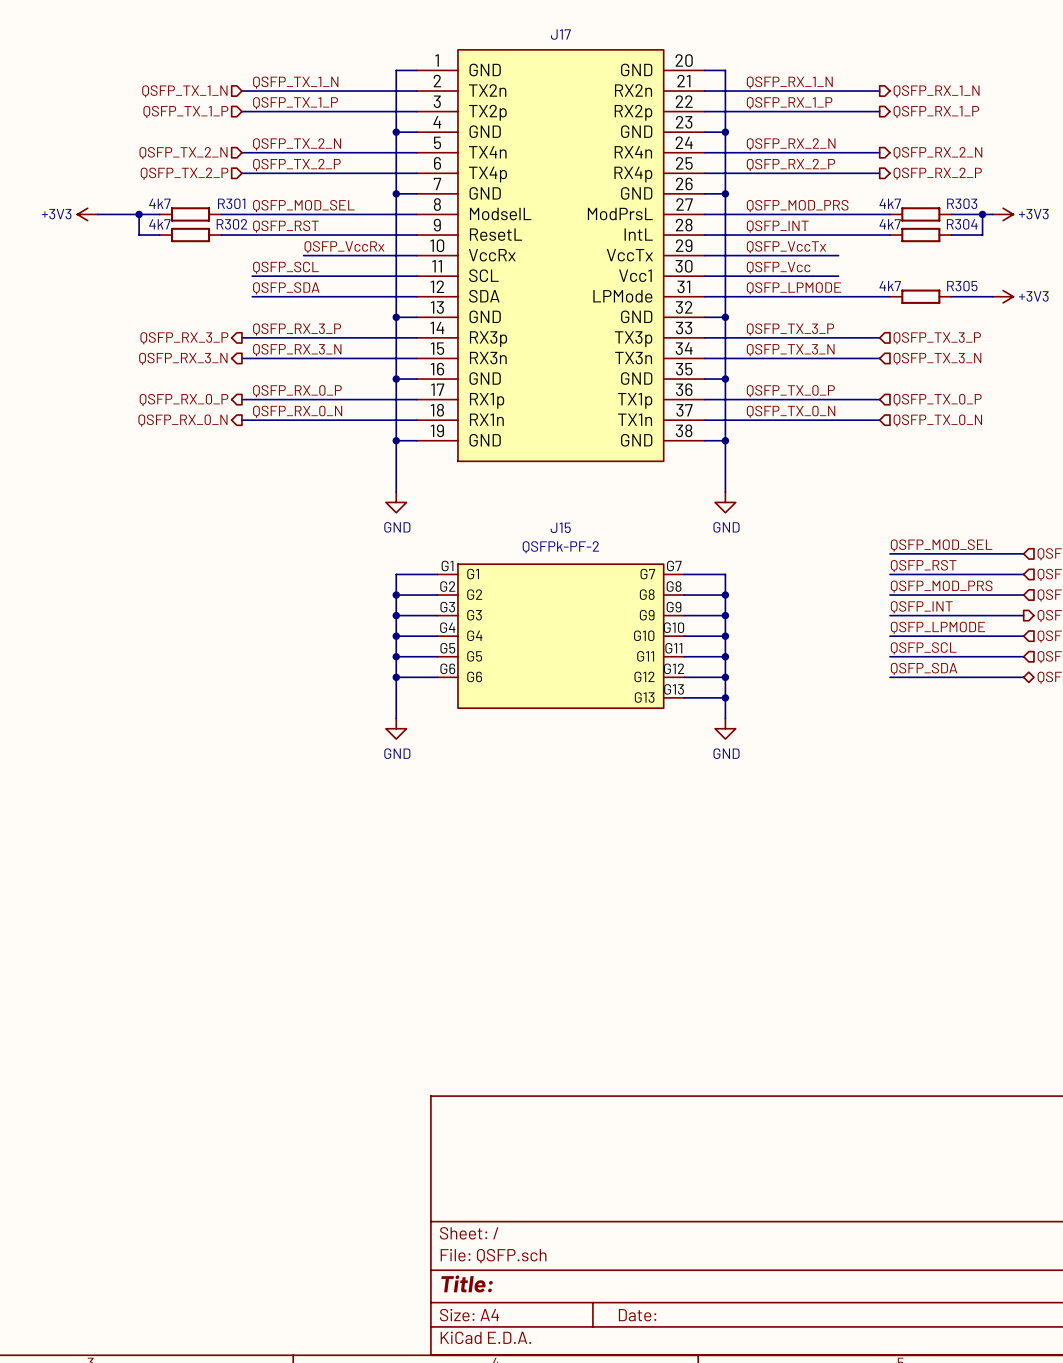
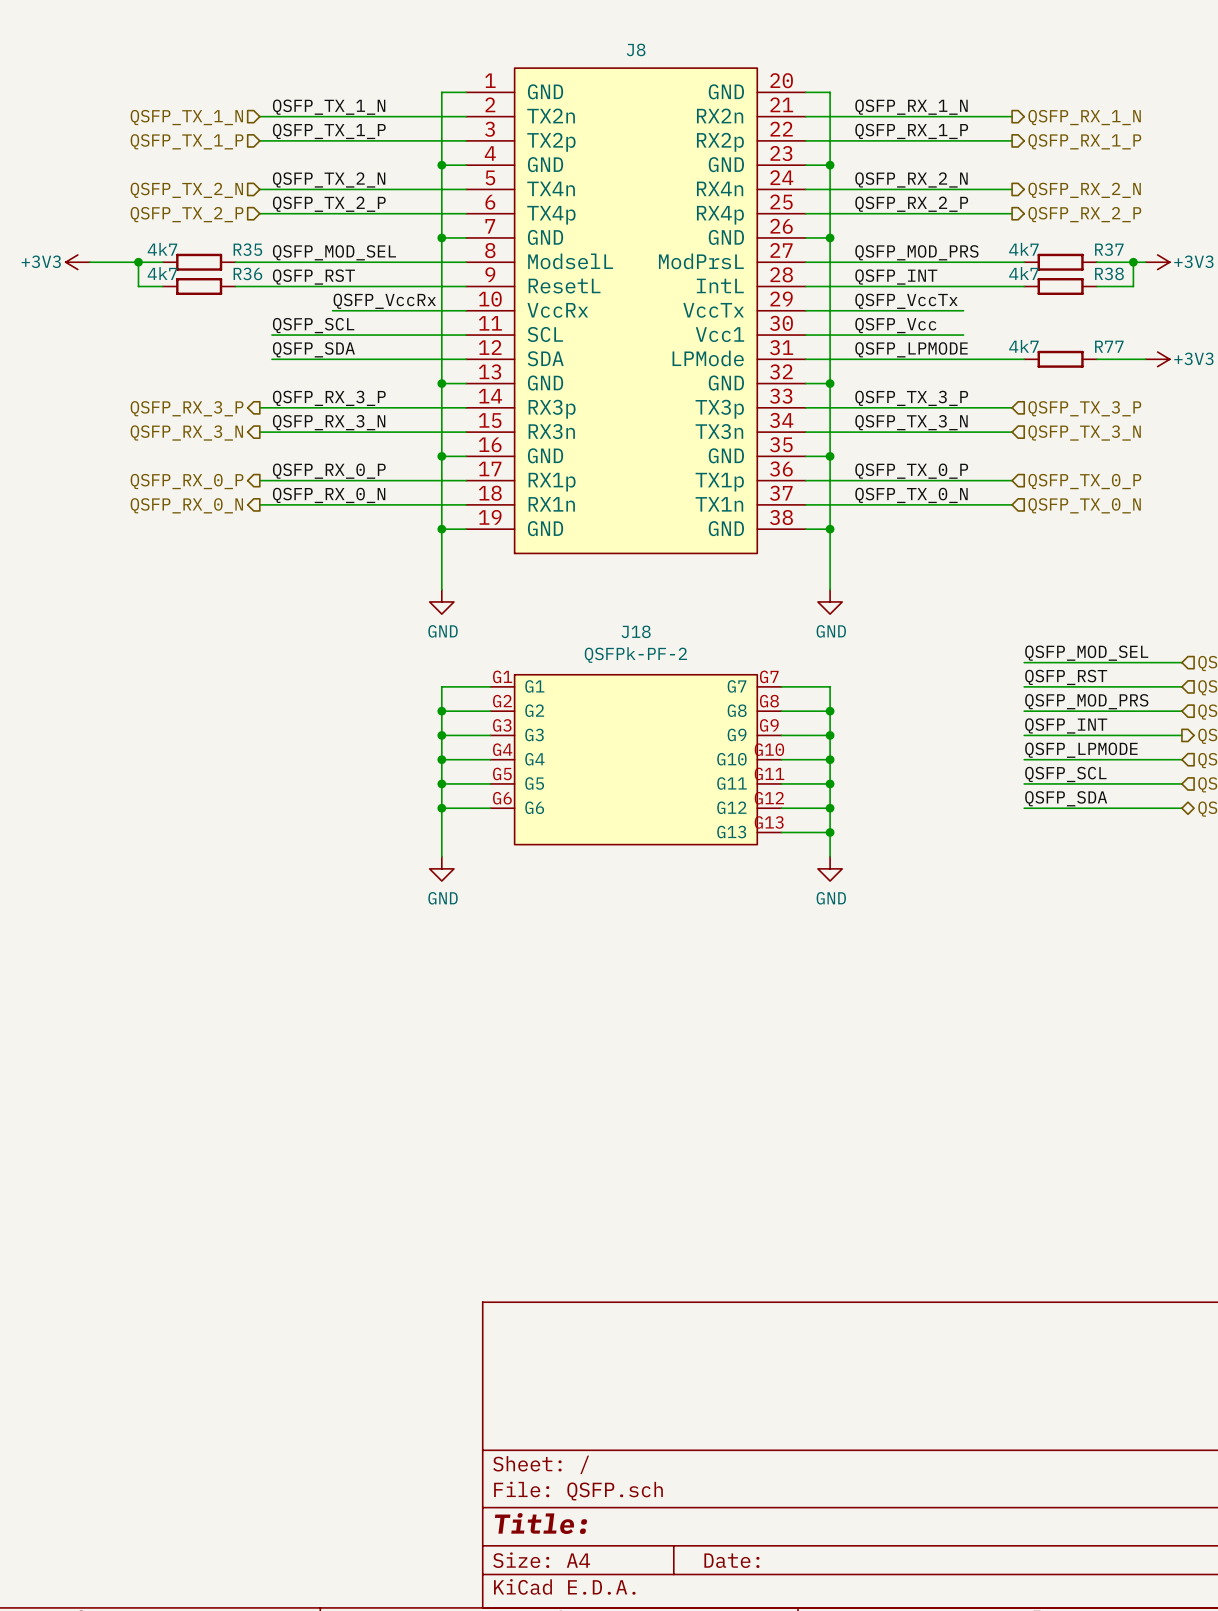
J17 name: J17 (560, 34) -> J8 (636, 49)
R301 name: R301 (231, 203) -> R35 (247, 249)
R303 name: R303 (962, 203) -> R37 (1109, 249)
R302 name: R302 (231, 224) -> R36 (247, 273)
R304 name: R304 (962, 224) -> R38 (1109, 273)
R305 name: R305 (962, 286) -> R77 (1109, 346)
J15 name: J15 (560, 527) -> J18 (636, 631)

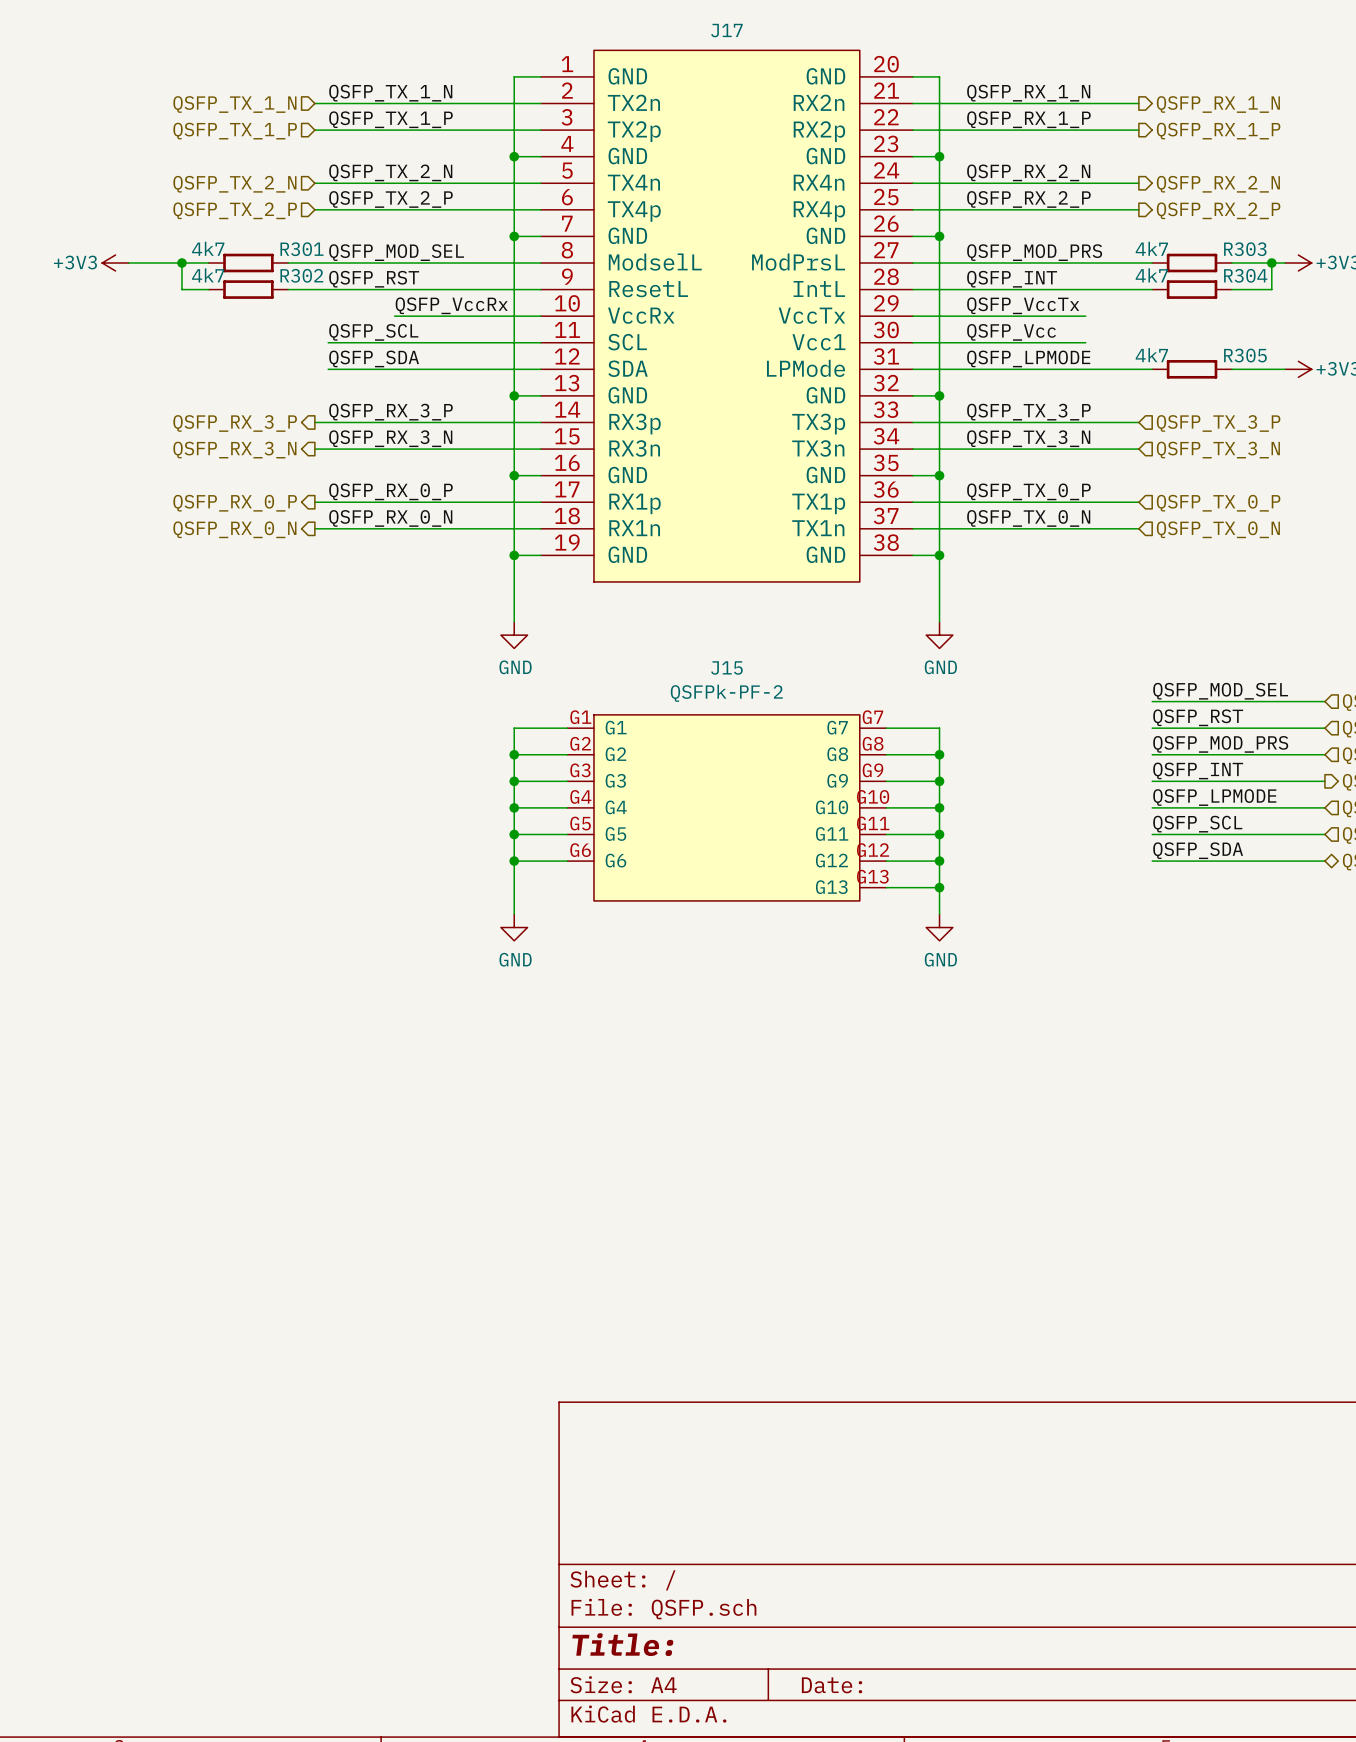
J8 name: J8 (636, 49) -> J17 (726, 30)
R35 name: R35 (247, 249) -> R301 (301, 249)
R37 name: R37 (1109, 249) -> R303 (1245, 249)
R36 name: R36 (247, 273) -> R302 (301, 275)
R38 name: R38 (1109, 273) -> R304 (1245, 275)
R77 name: R77 (1109, 346) -> R305 (1245, 355)
J18 name: J18 (636, 631) -> J15 (726, 667)

